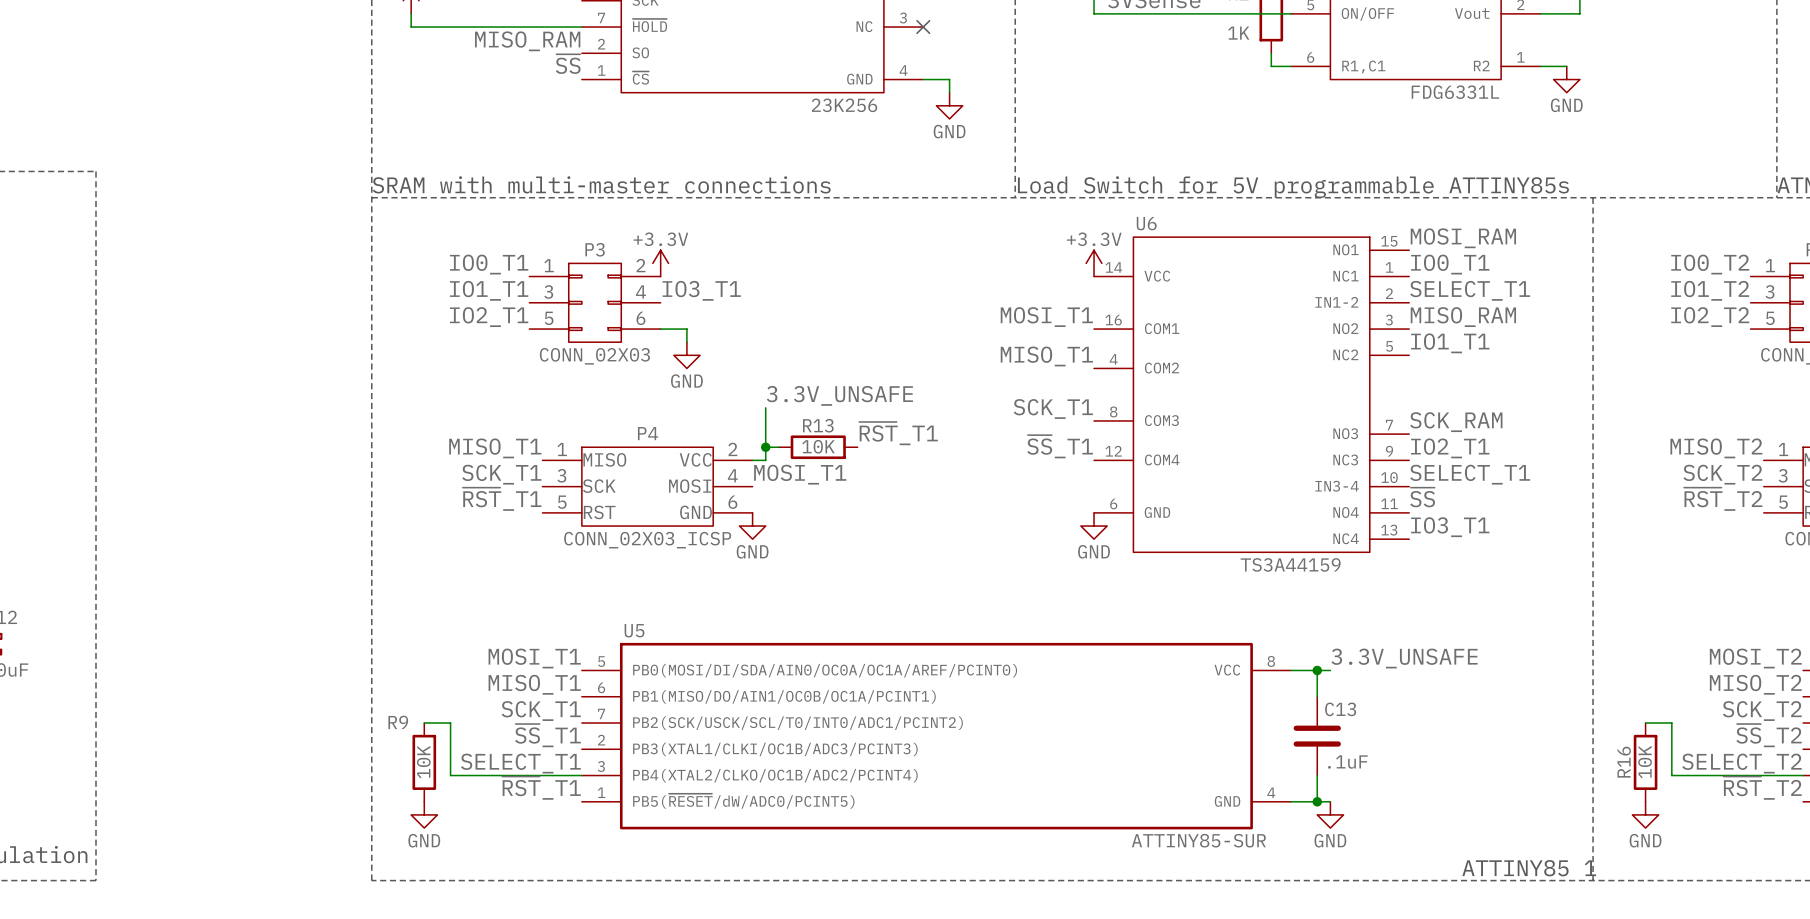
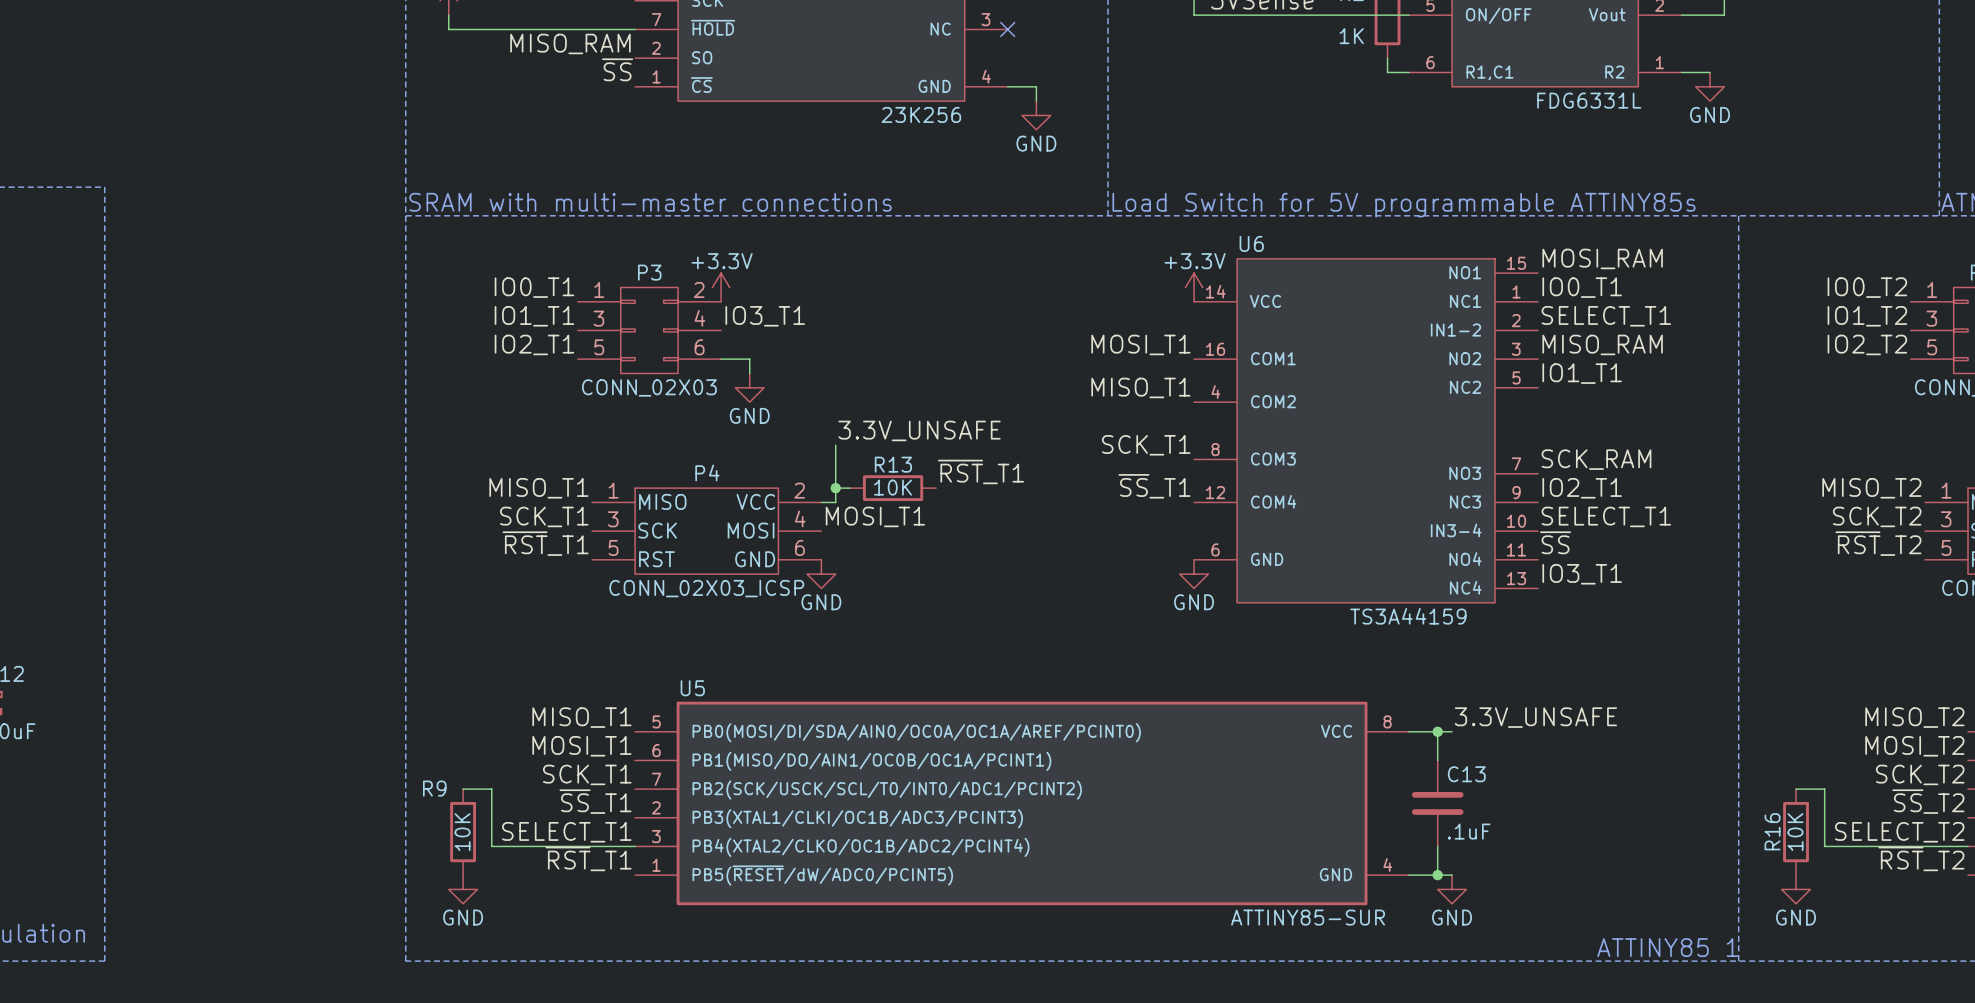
label: MOSI_T1 (534, 658) -> MISO_T1 (581, 717)
label: MOSI_T2 (1755, 658) -> MISO_T2 (1914, 717)
label: MISO_T1 (534, 684) -> MOSI_T1 (581, 746)
label: MISO_T2 (1755, 684) -> MOSI_T2 (1914, 746)

